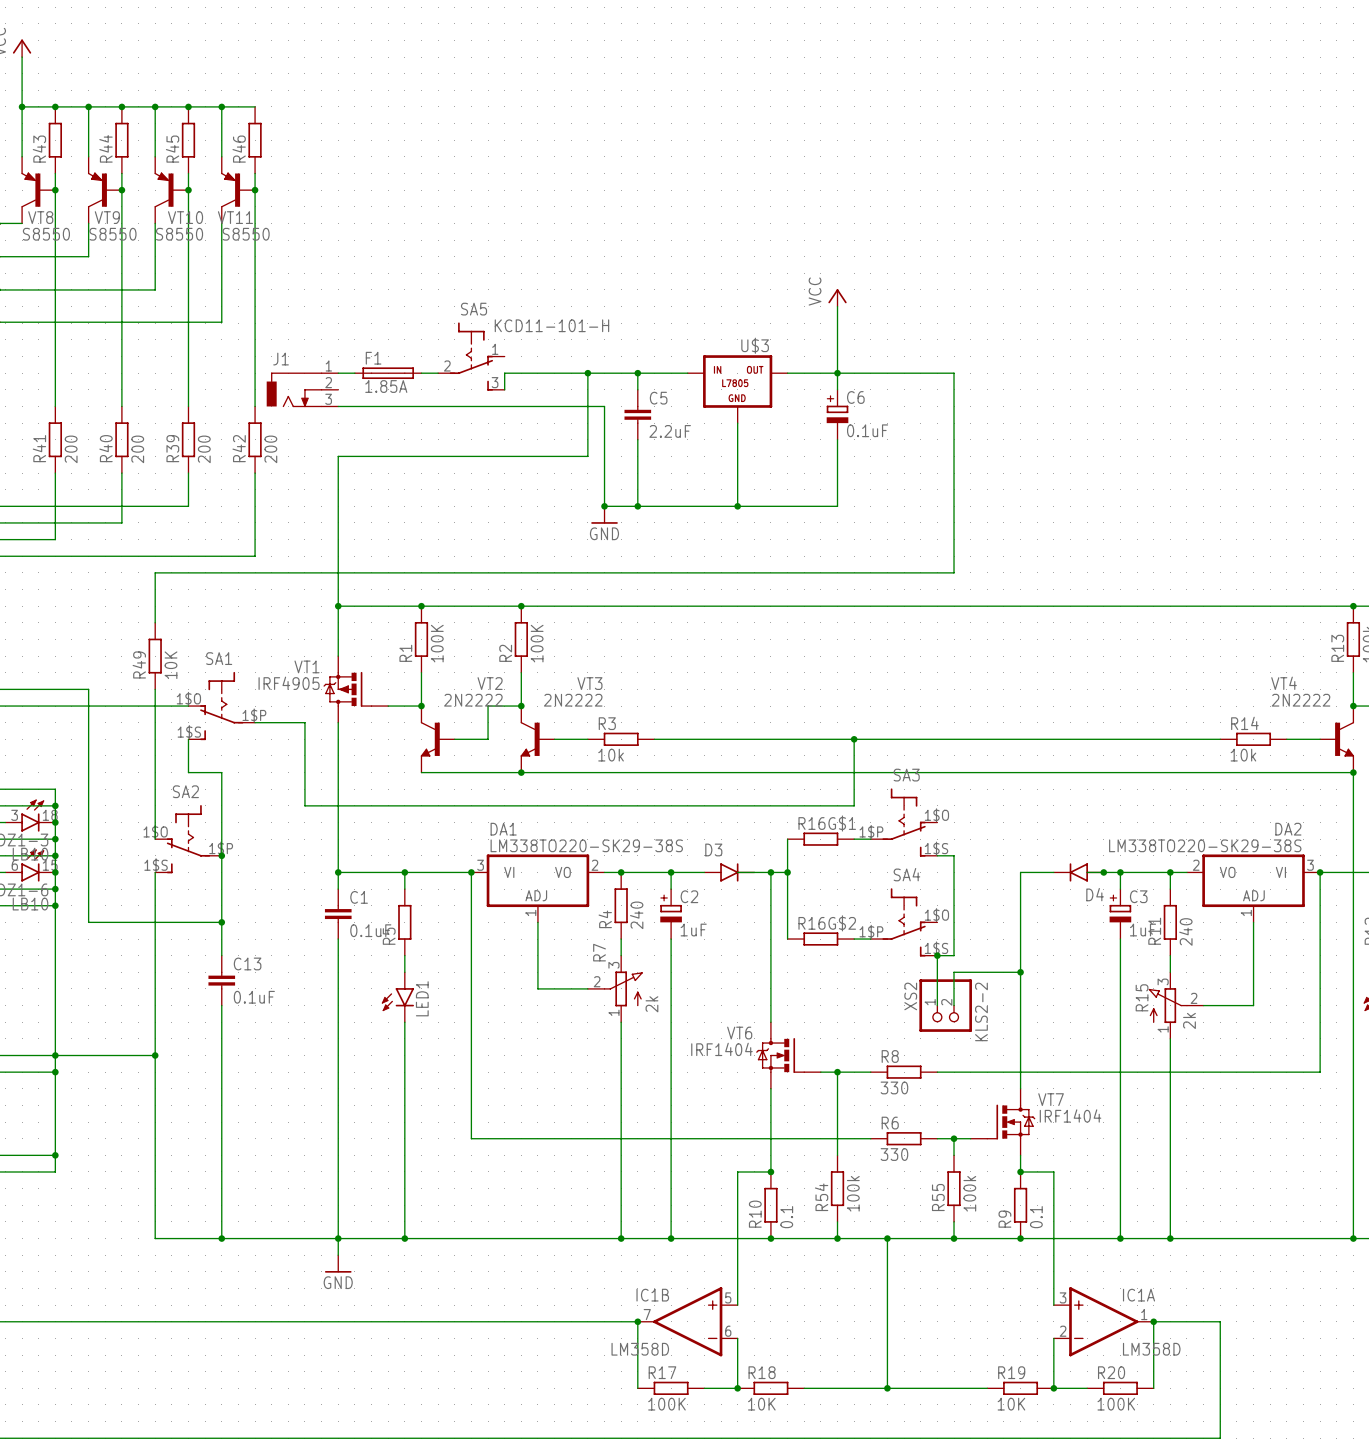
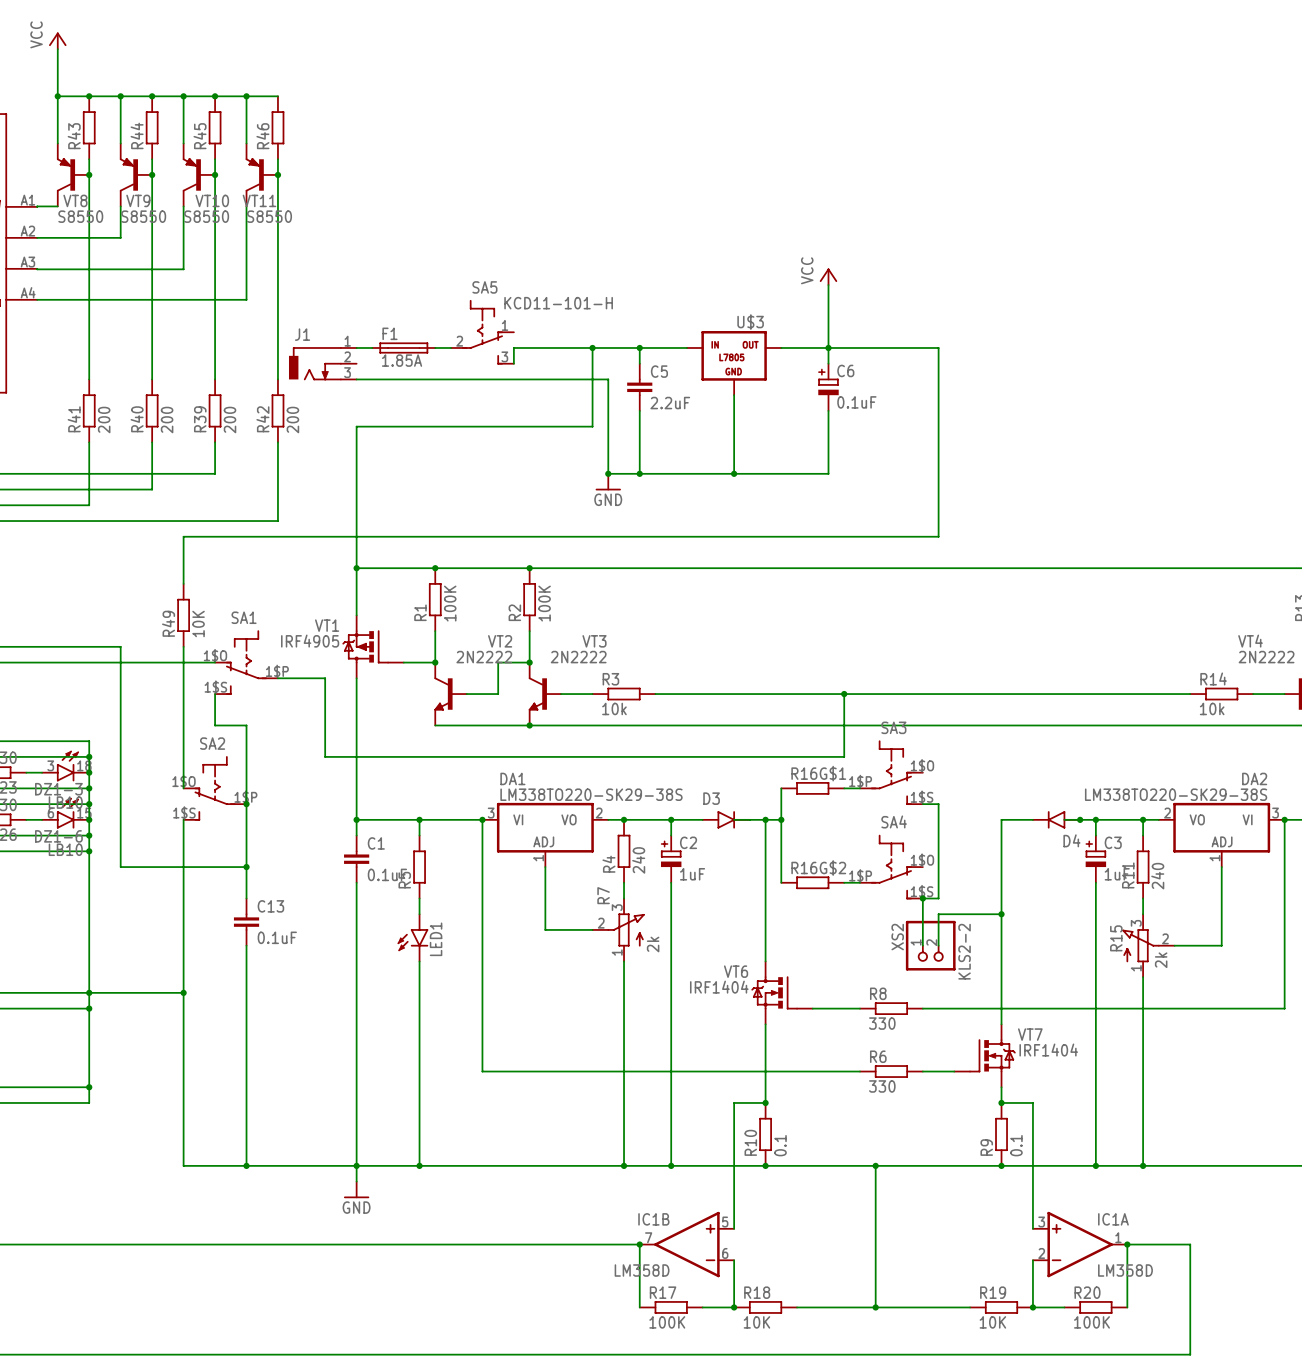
wire: (837, 1072) (837, 1155) -> none
junction: (837, 1072) -> none
wire: (954, 1138) (954, 1155) -> none
junction: (954, 1138) -> none
R54: 100k (837, 1188) -> none
R55: 100k (954, 1188) -> none
wire: (837, 1221) (837, 1238) -> none
wire: (954, 1221) (954, 1238) -> none
junction: (837, 1238) -> none
junction: (954, 1238) -> none

